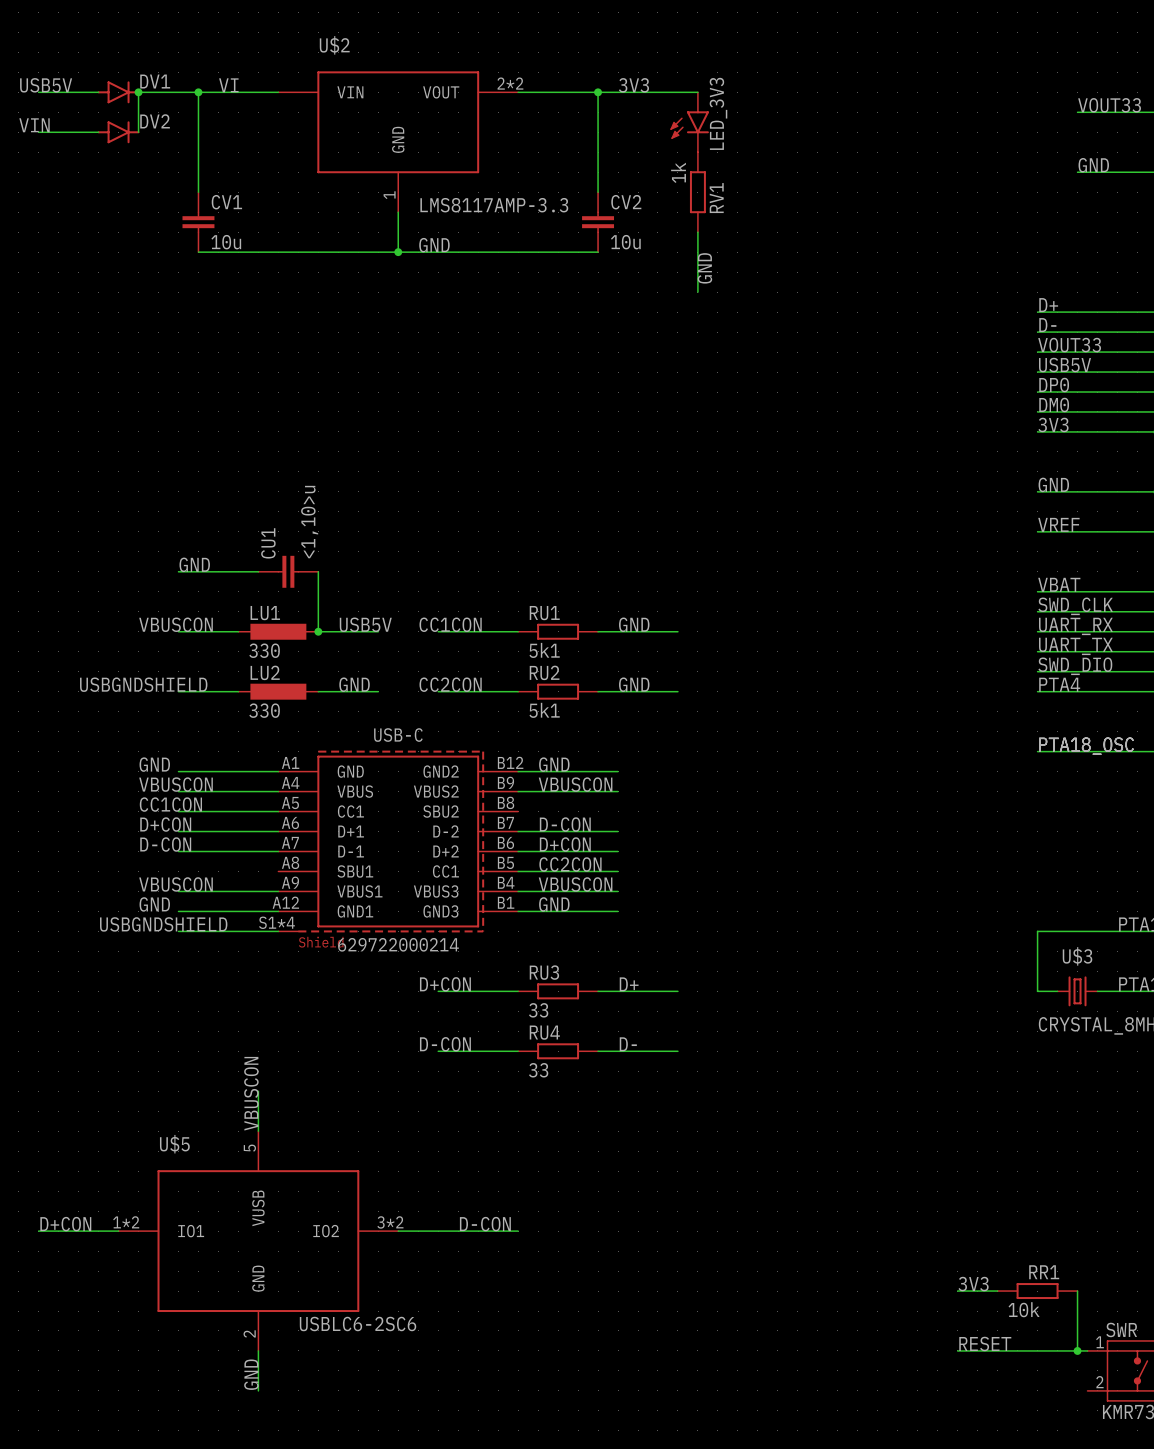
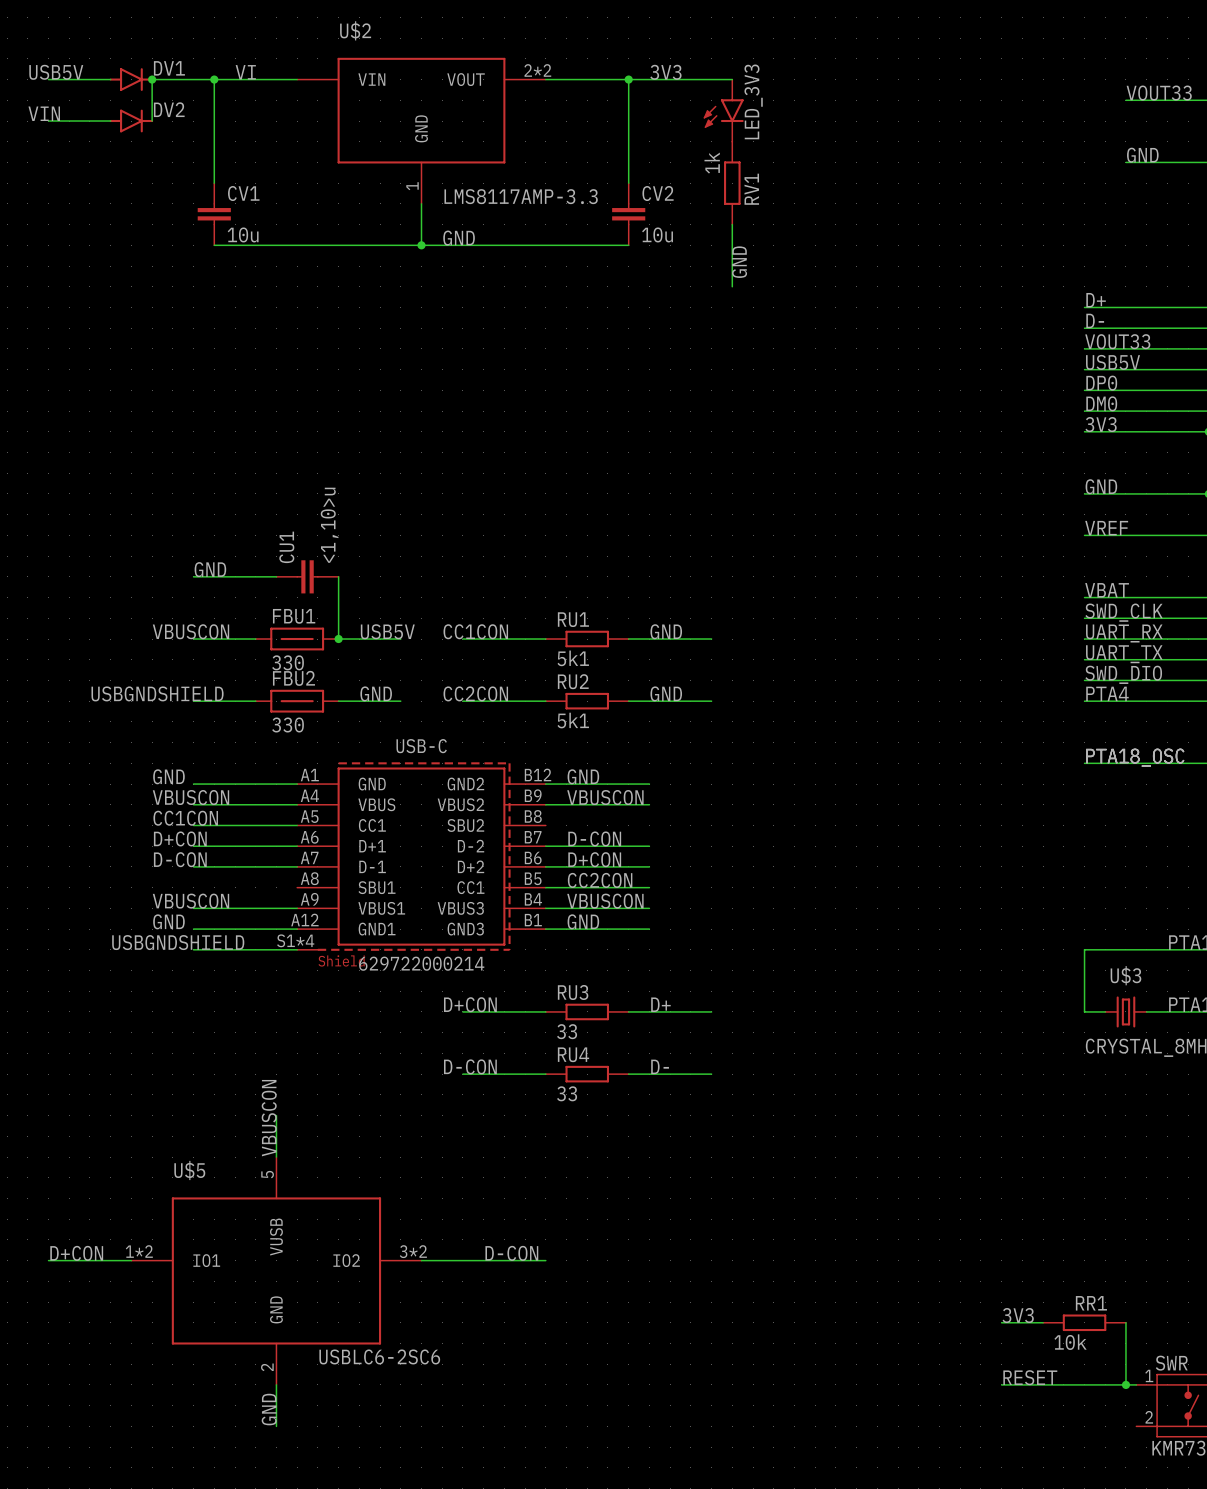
LU1: 330 (278, 631) -> none
FBU1: none -> 330 (297, 639)
LU2: 330 (278, 691) -> none
FBU2: none -> 330 (297, 701)

